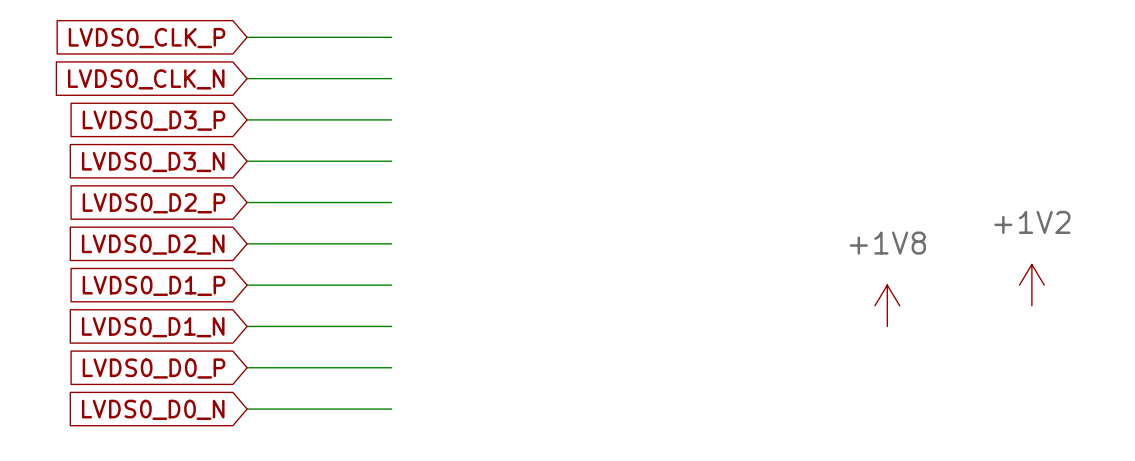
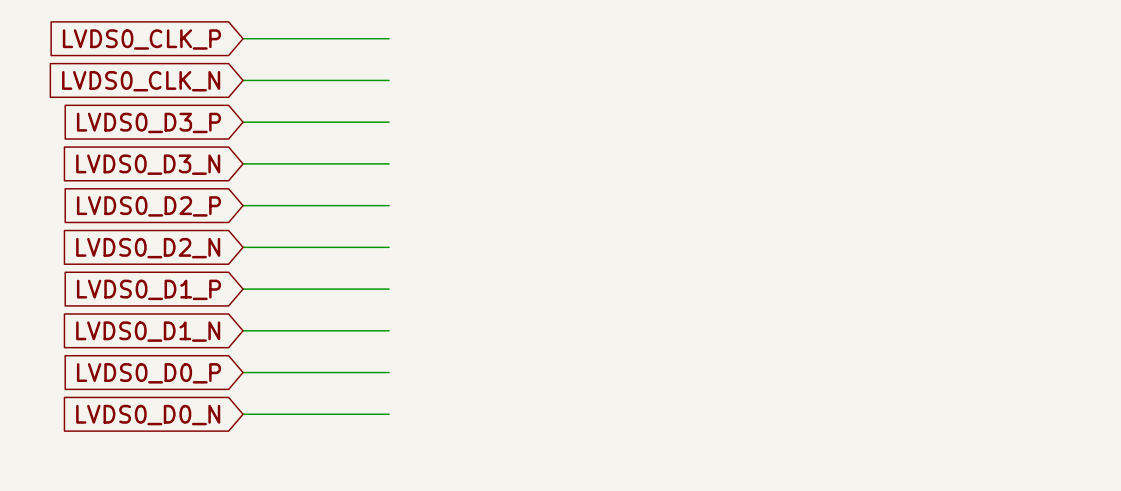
power symbol: +1V2 (1031, 285) -> none
power symbol: +1V8 (887, 305) -> none

